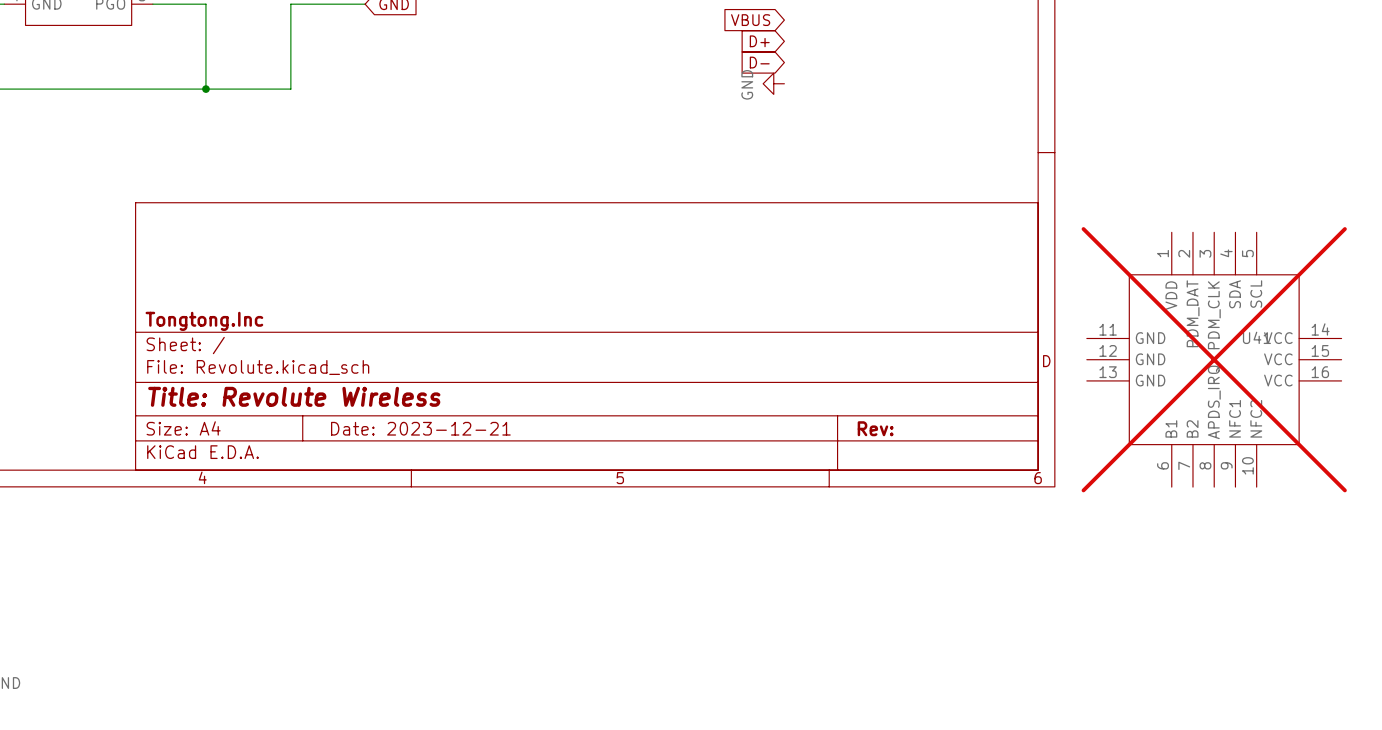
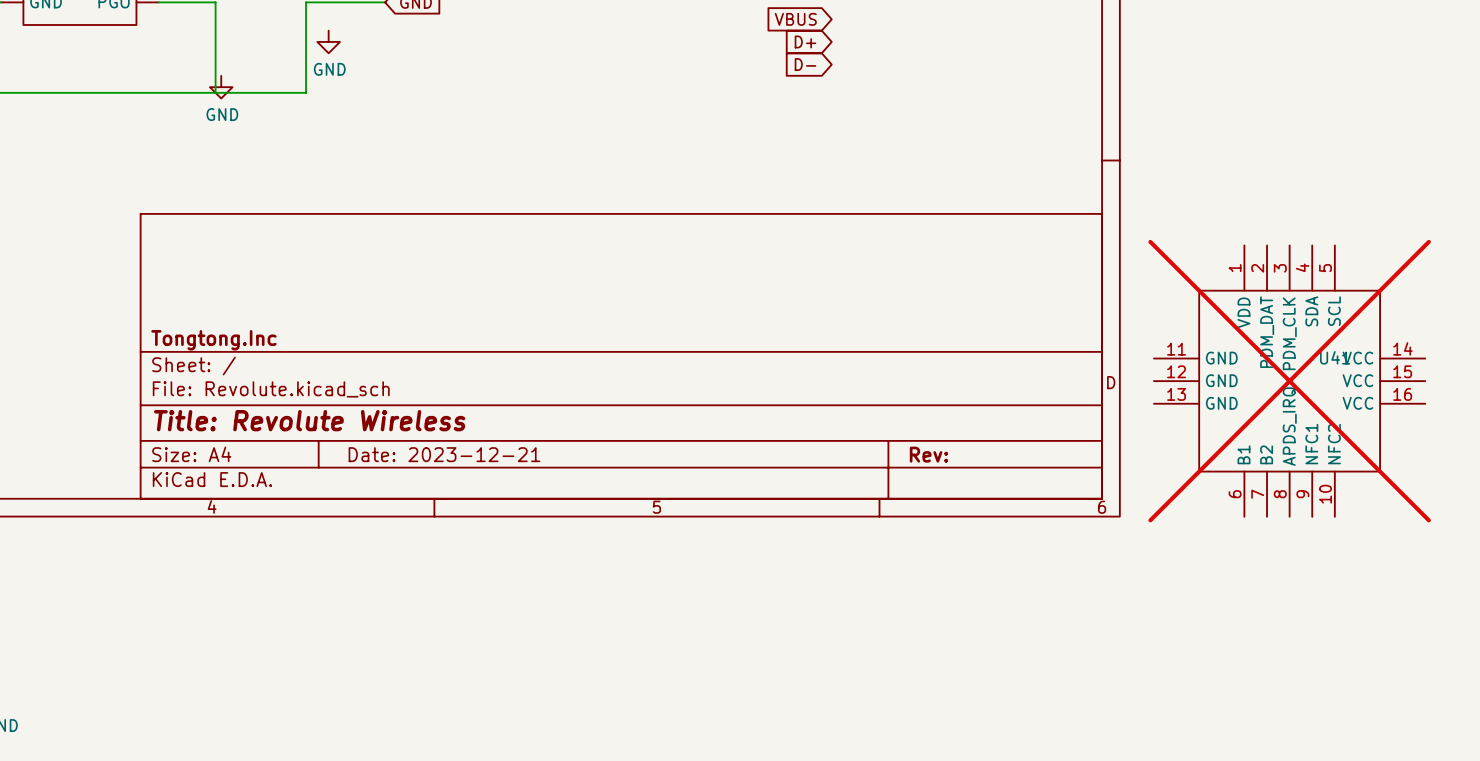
power symbol: none -> GND (328, 41)
power symbol: none -> GND (221, 87)
power symbol: GND (773, 83) -> none
junction: (205, 89) -> none

